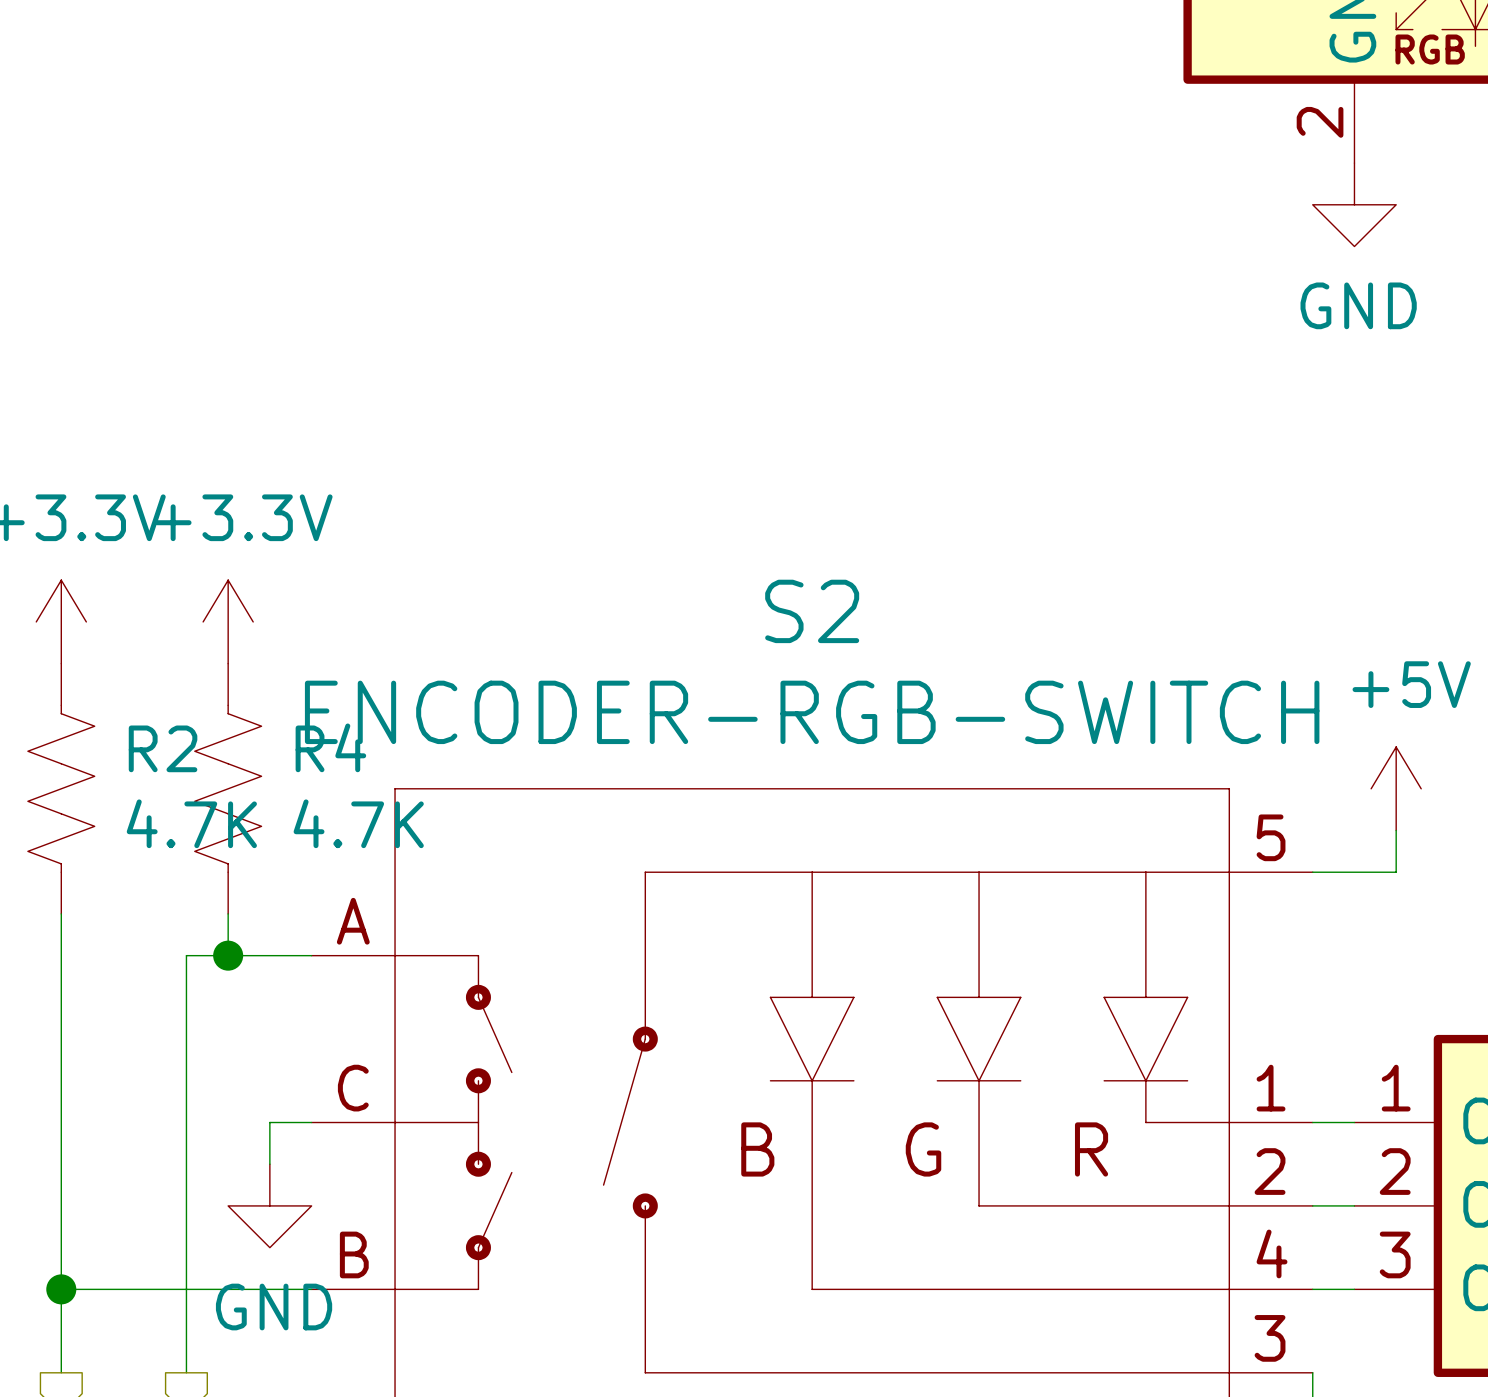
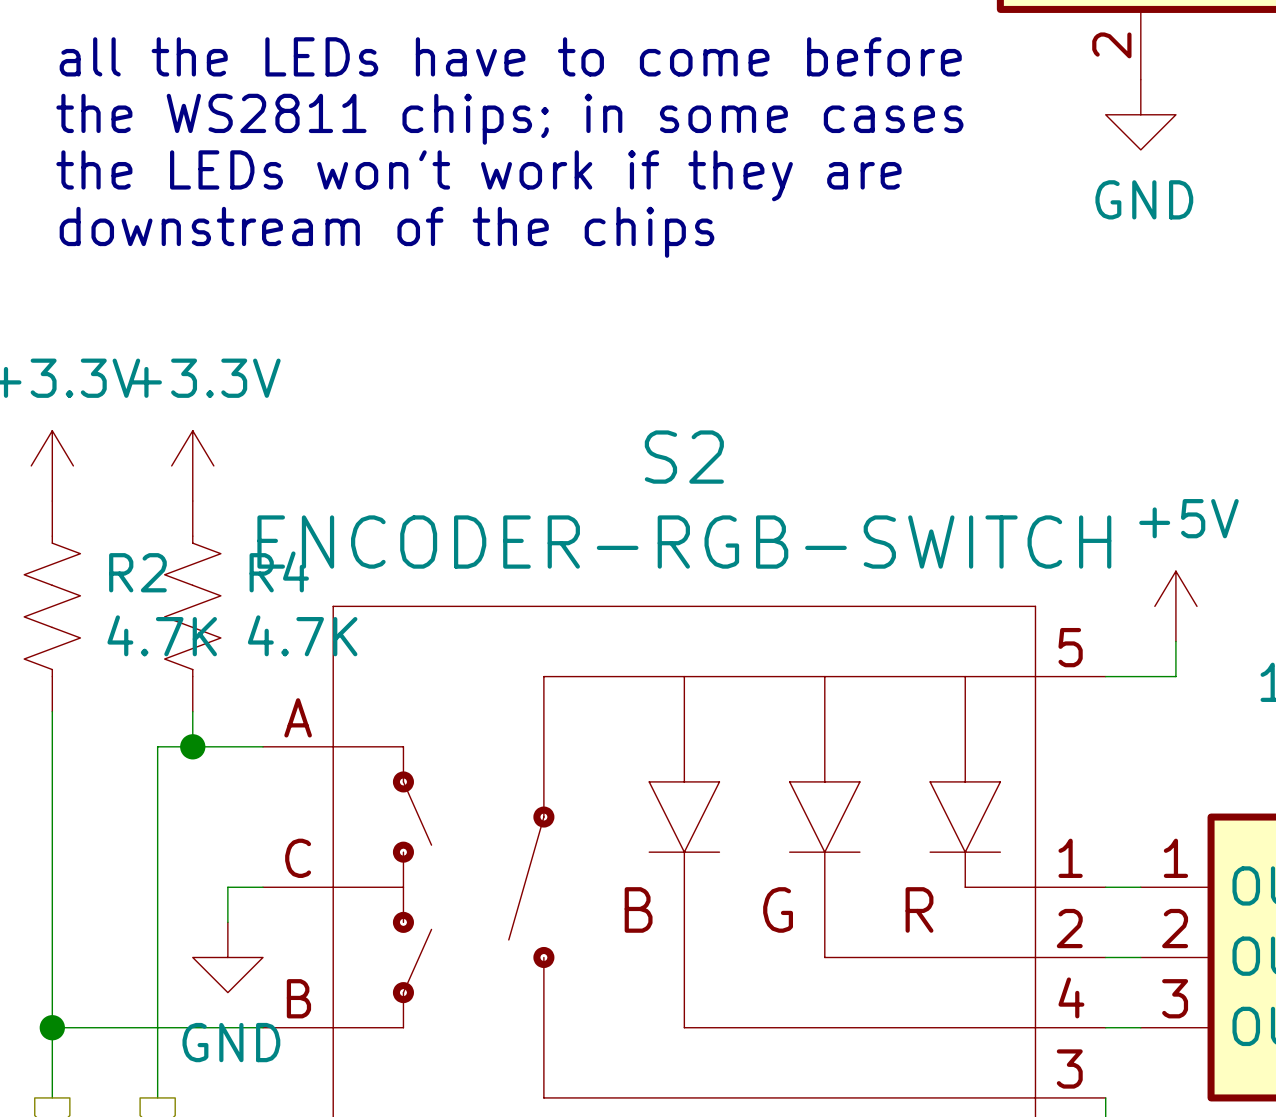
text: none -> all the LEDs have to come before (510, 56)
text: none -> the WS2811 chips; in some cases (509, 119)
text: none -> the LEDs won't work if they are (478, 175)
text: none -> downstream of the chips (386, 232)

